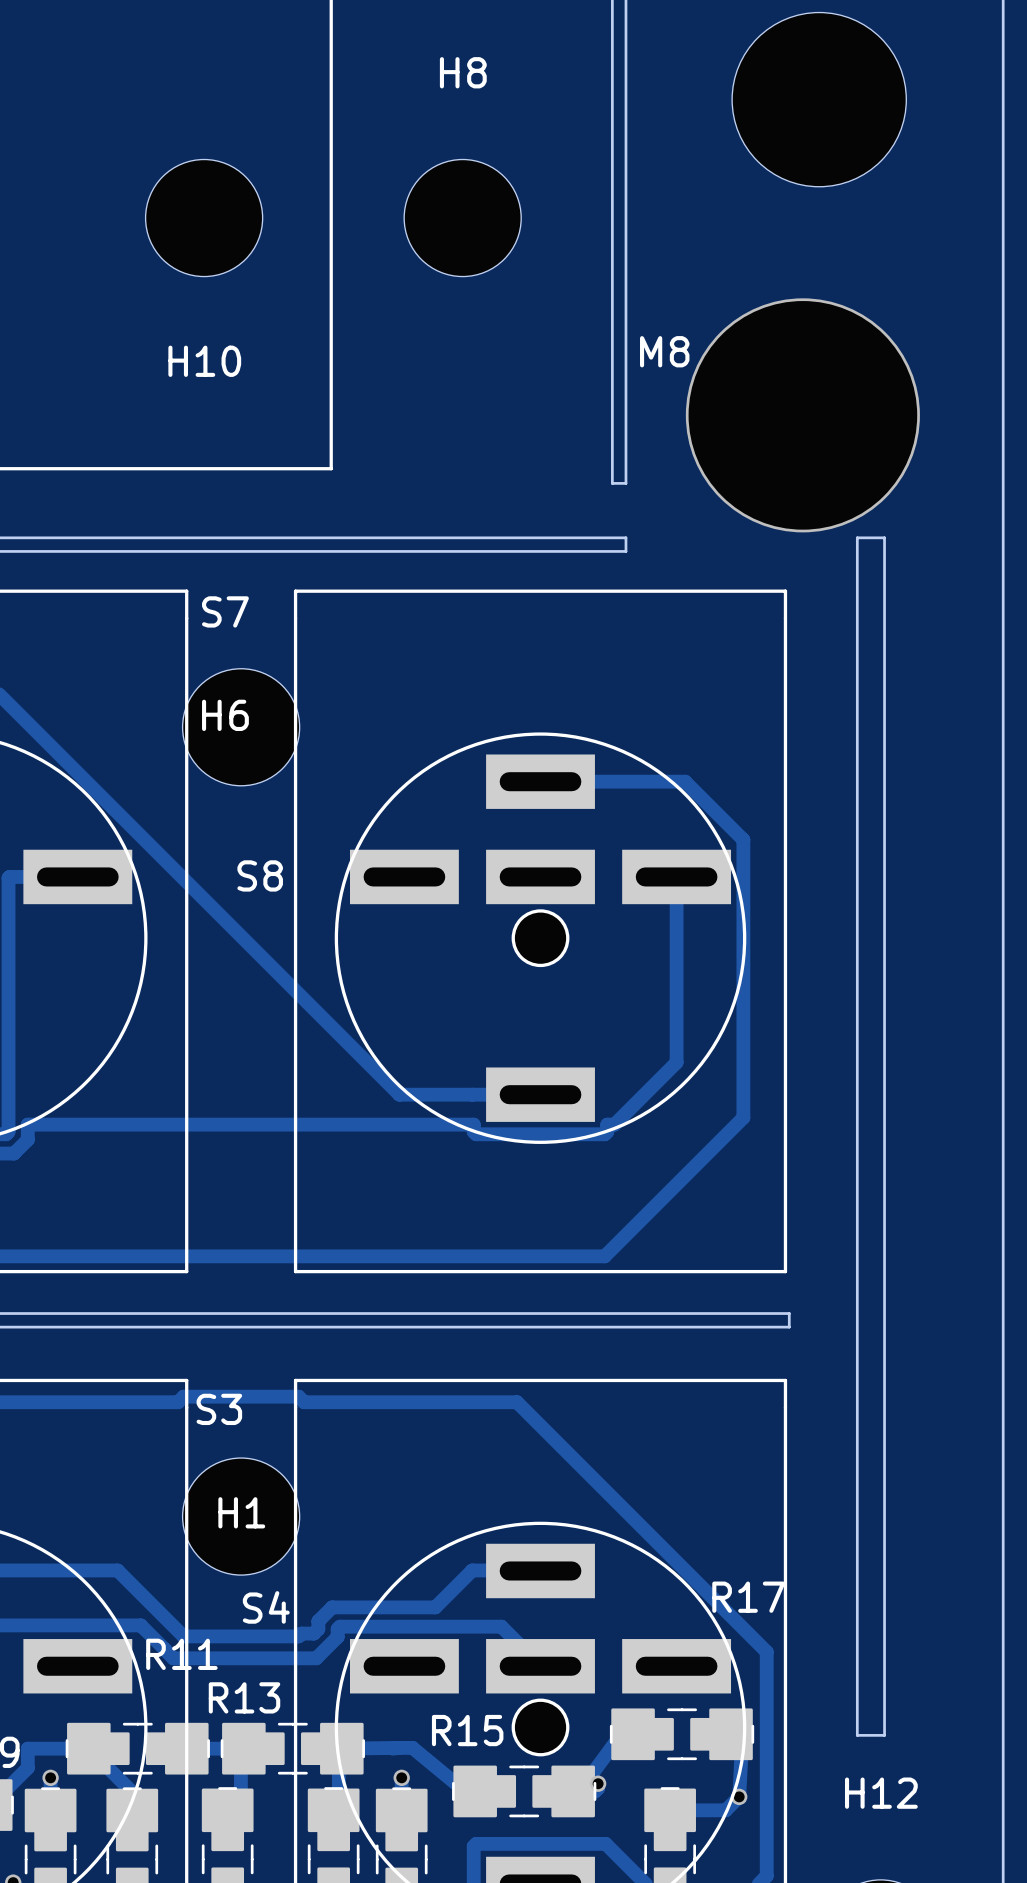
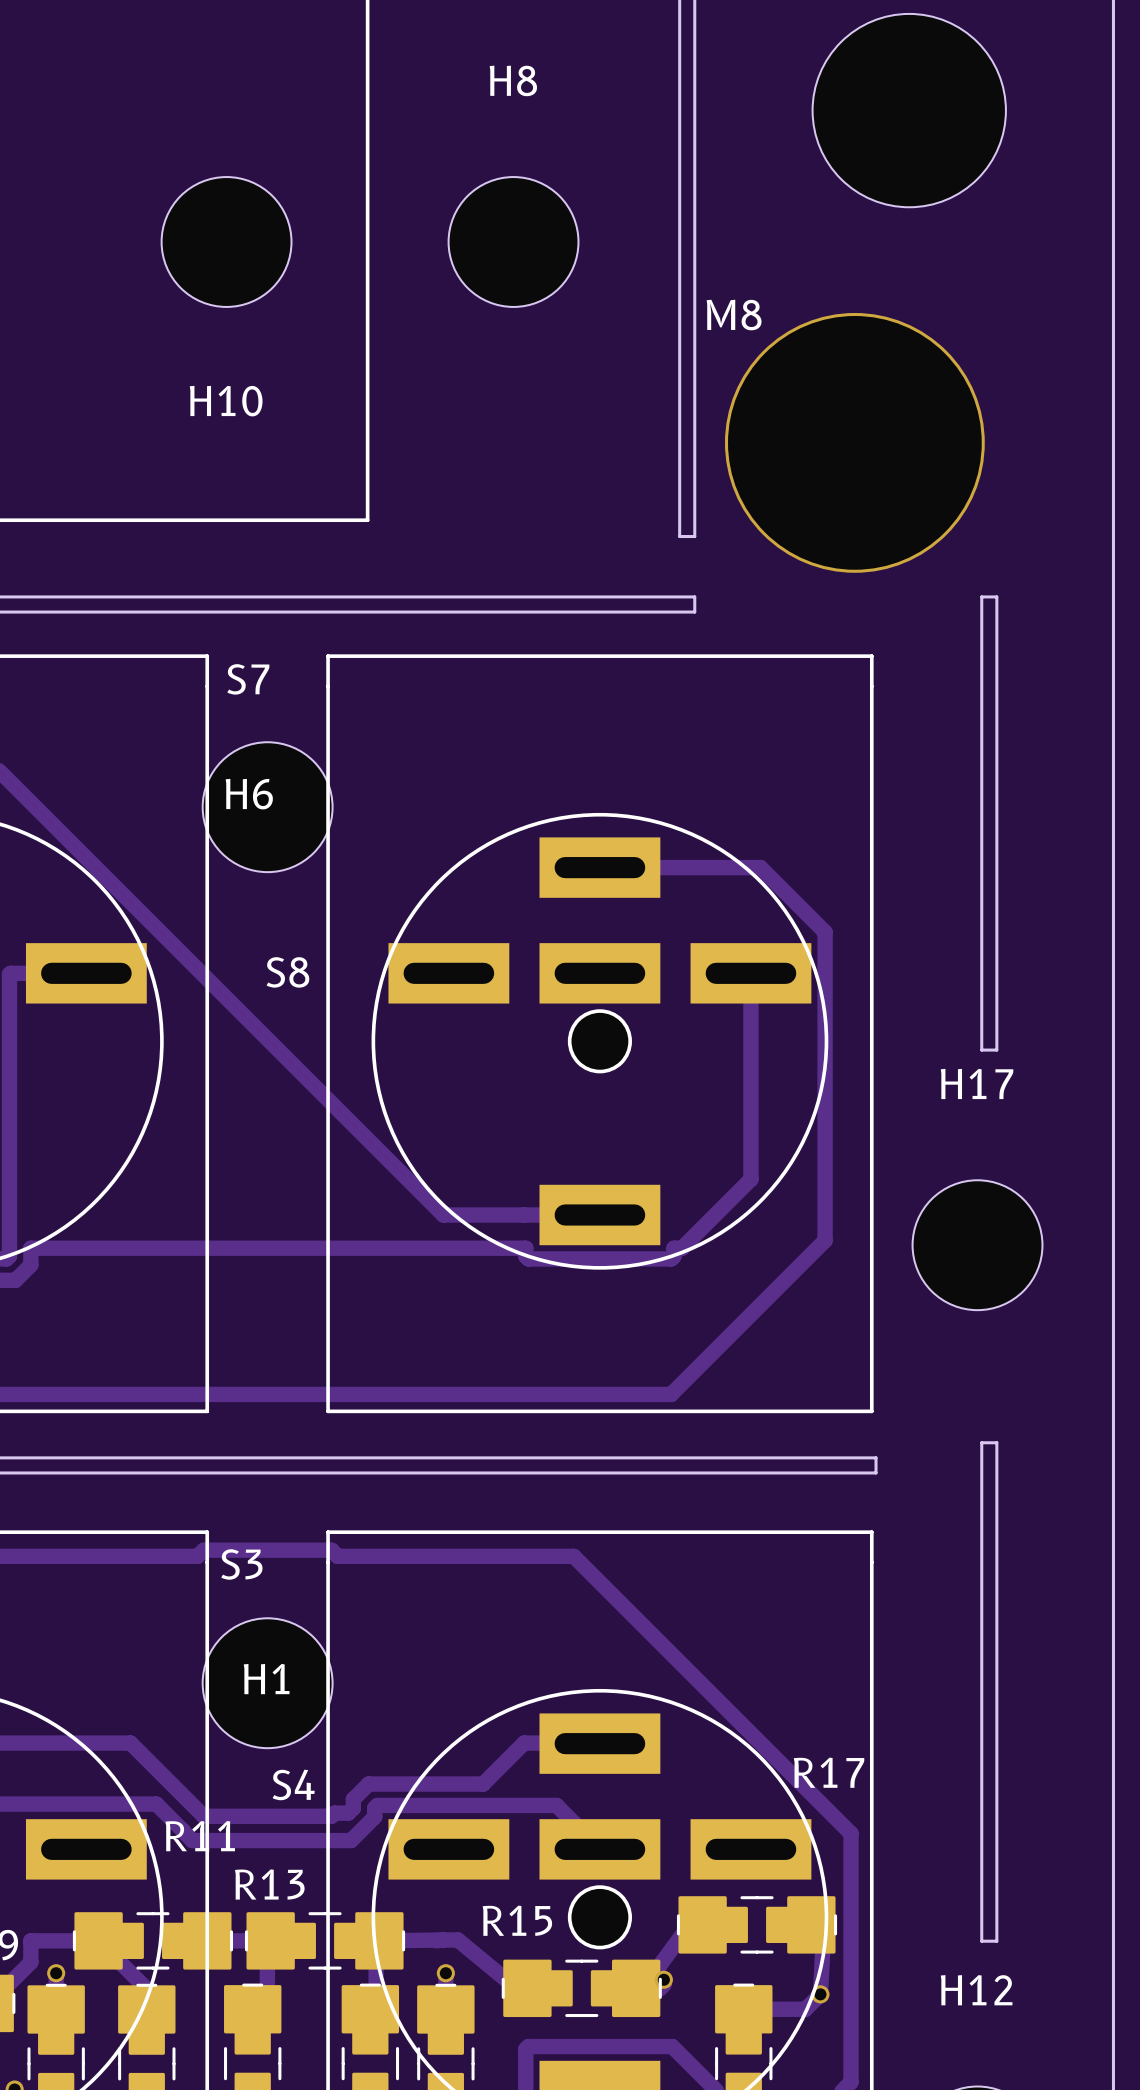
text position: M8 (664, 351) -> M8 (734, 315)
via position: (802, 415) -> (854, 442)
board edge: (884, 537) (857, 537) (857, 1735) (884, 1735) -> (981, 1442) (996, 1442) (996, 1941) (981, 1941) (981, 1926)
board edge: (884, 946) (884, 1299) -> (981, 1050) (996, 1050) (996, 596) (981, 596)
H17: none -> (977, 1245)

